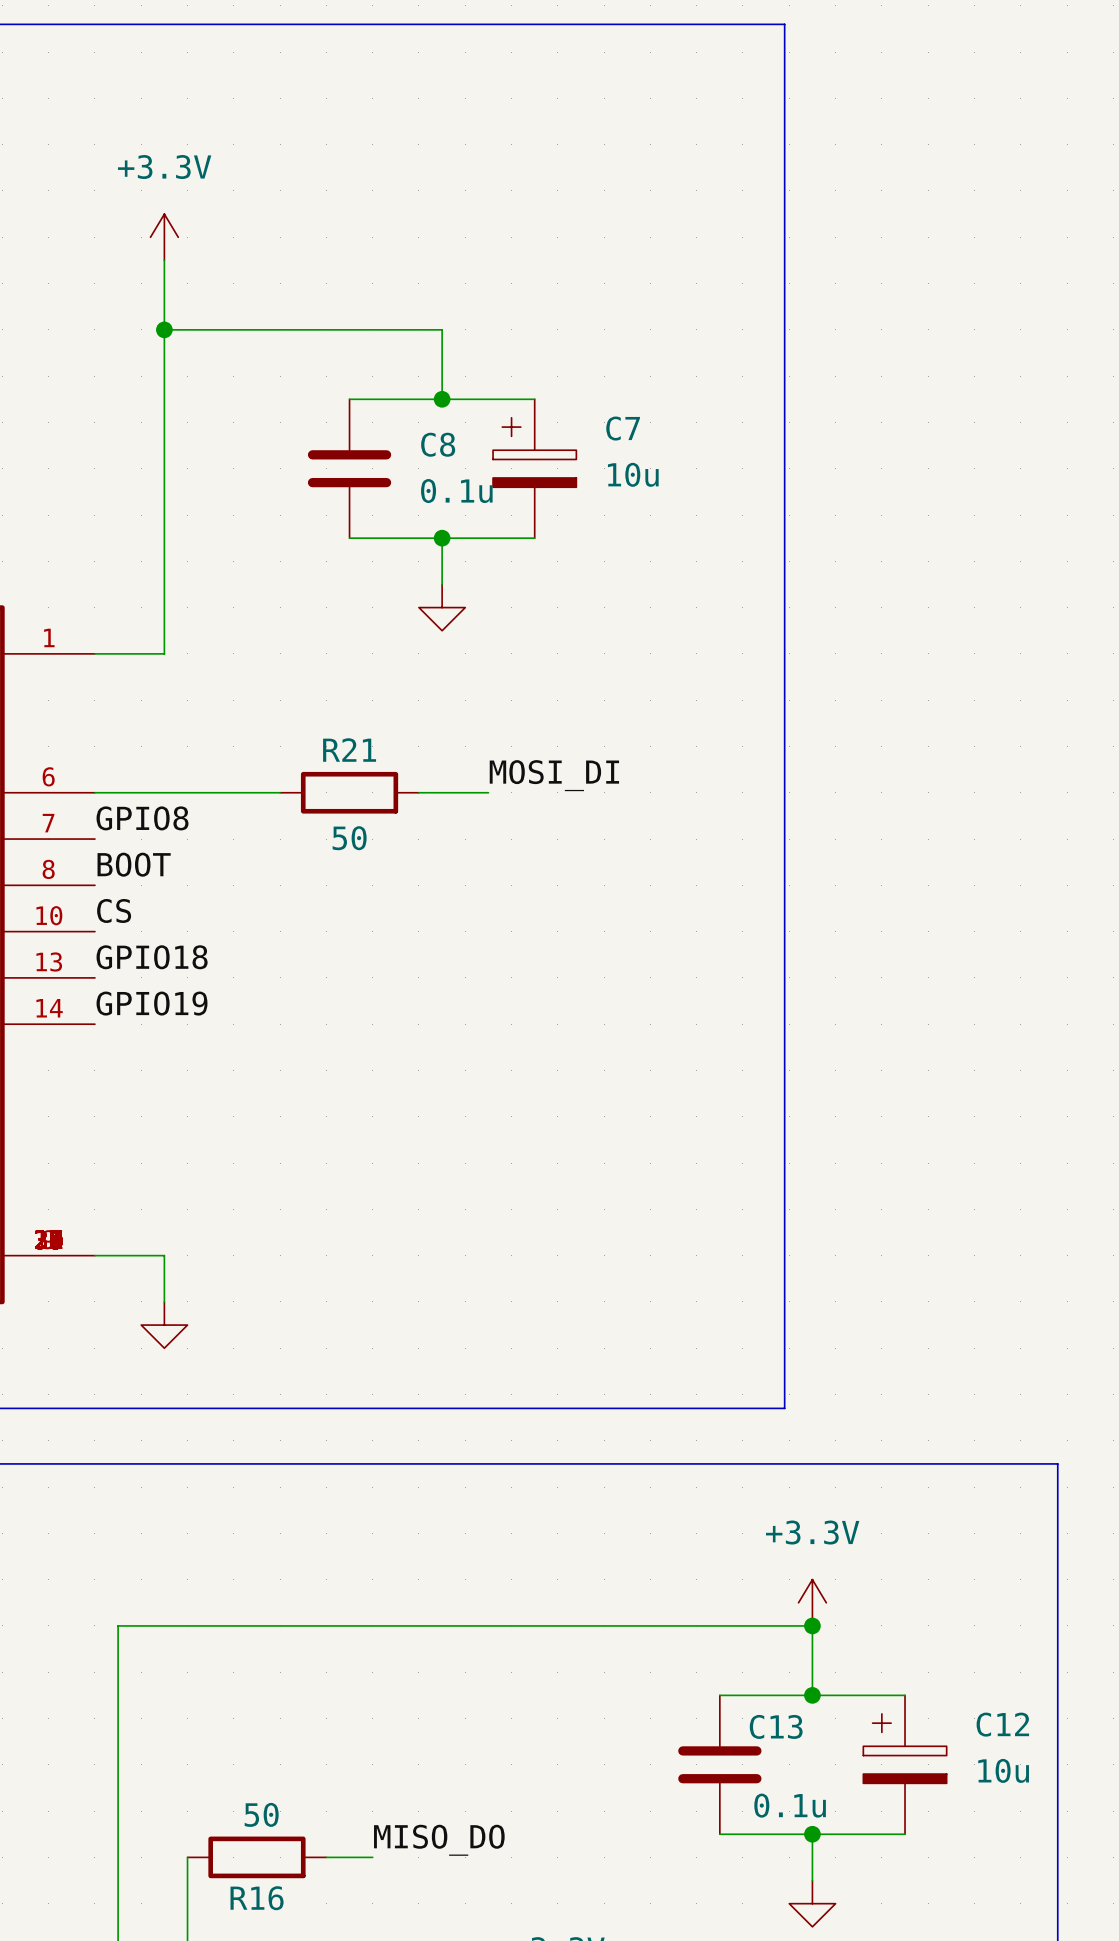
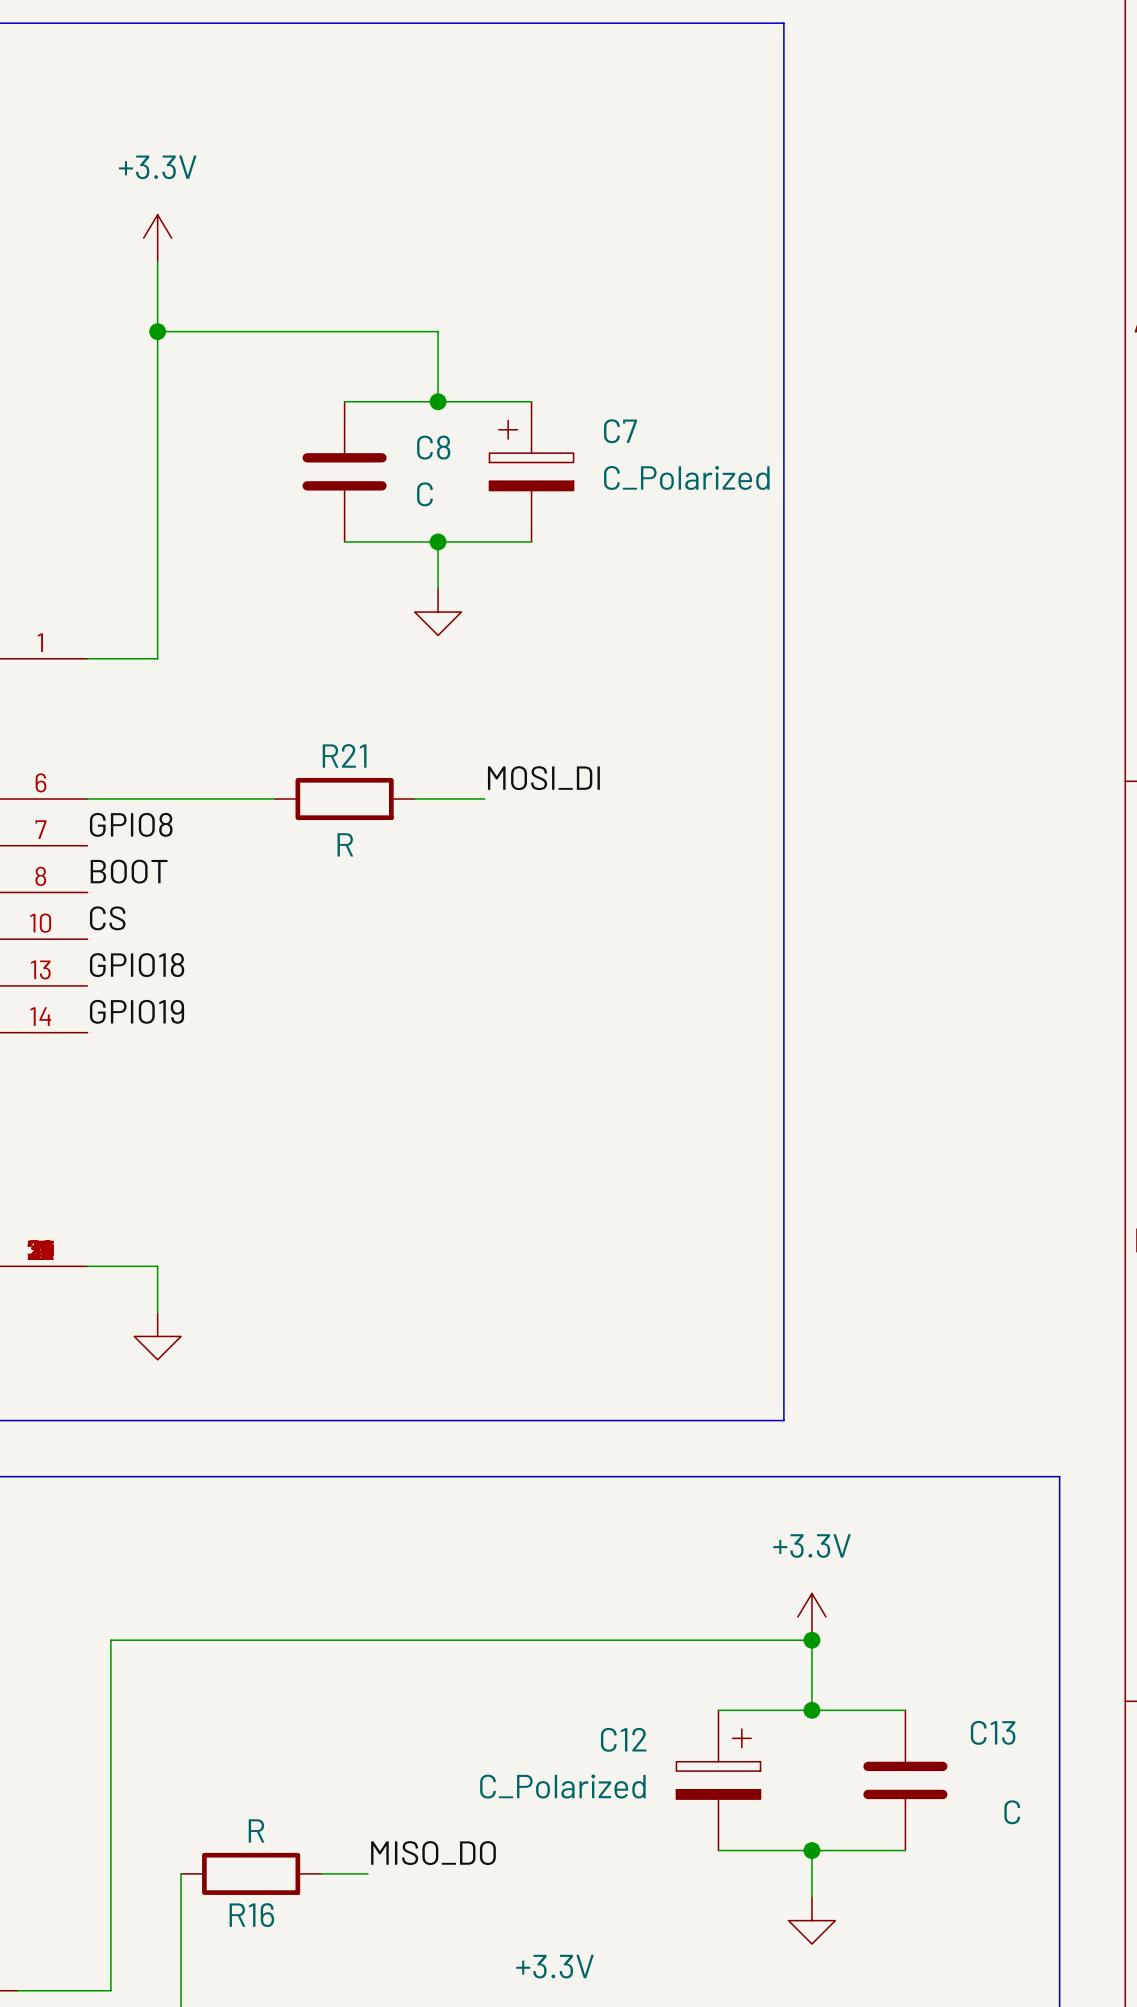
C7 value: 10u (633, 474) -> C_Polarized (686, 477)
C8 value: 0.1u (456, 491) -> C (424, 494)
R21 value: 50 (349, 838) -> R (345, 844)
C13 name position: C13 (776, 1726) -> C13 (993, 1732)
C12 flip: as is (905, 1748) -> left-right (718, 1764)
C13 position: (719, 1764) -> (905, 1780)
C12 position: (905, 1764) -> (718, 1780)
C12 value: 10u (1003, 1770) -> C_Polarized (562, 1786)
C13 value: 0.1u (790, 1805) -> C (1012, 1812)
R16 value: 50 (261, 1814) -> R (256, 1830)

